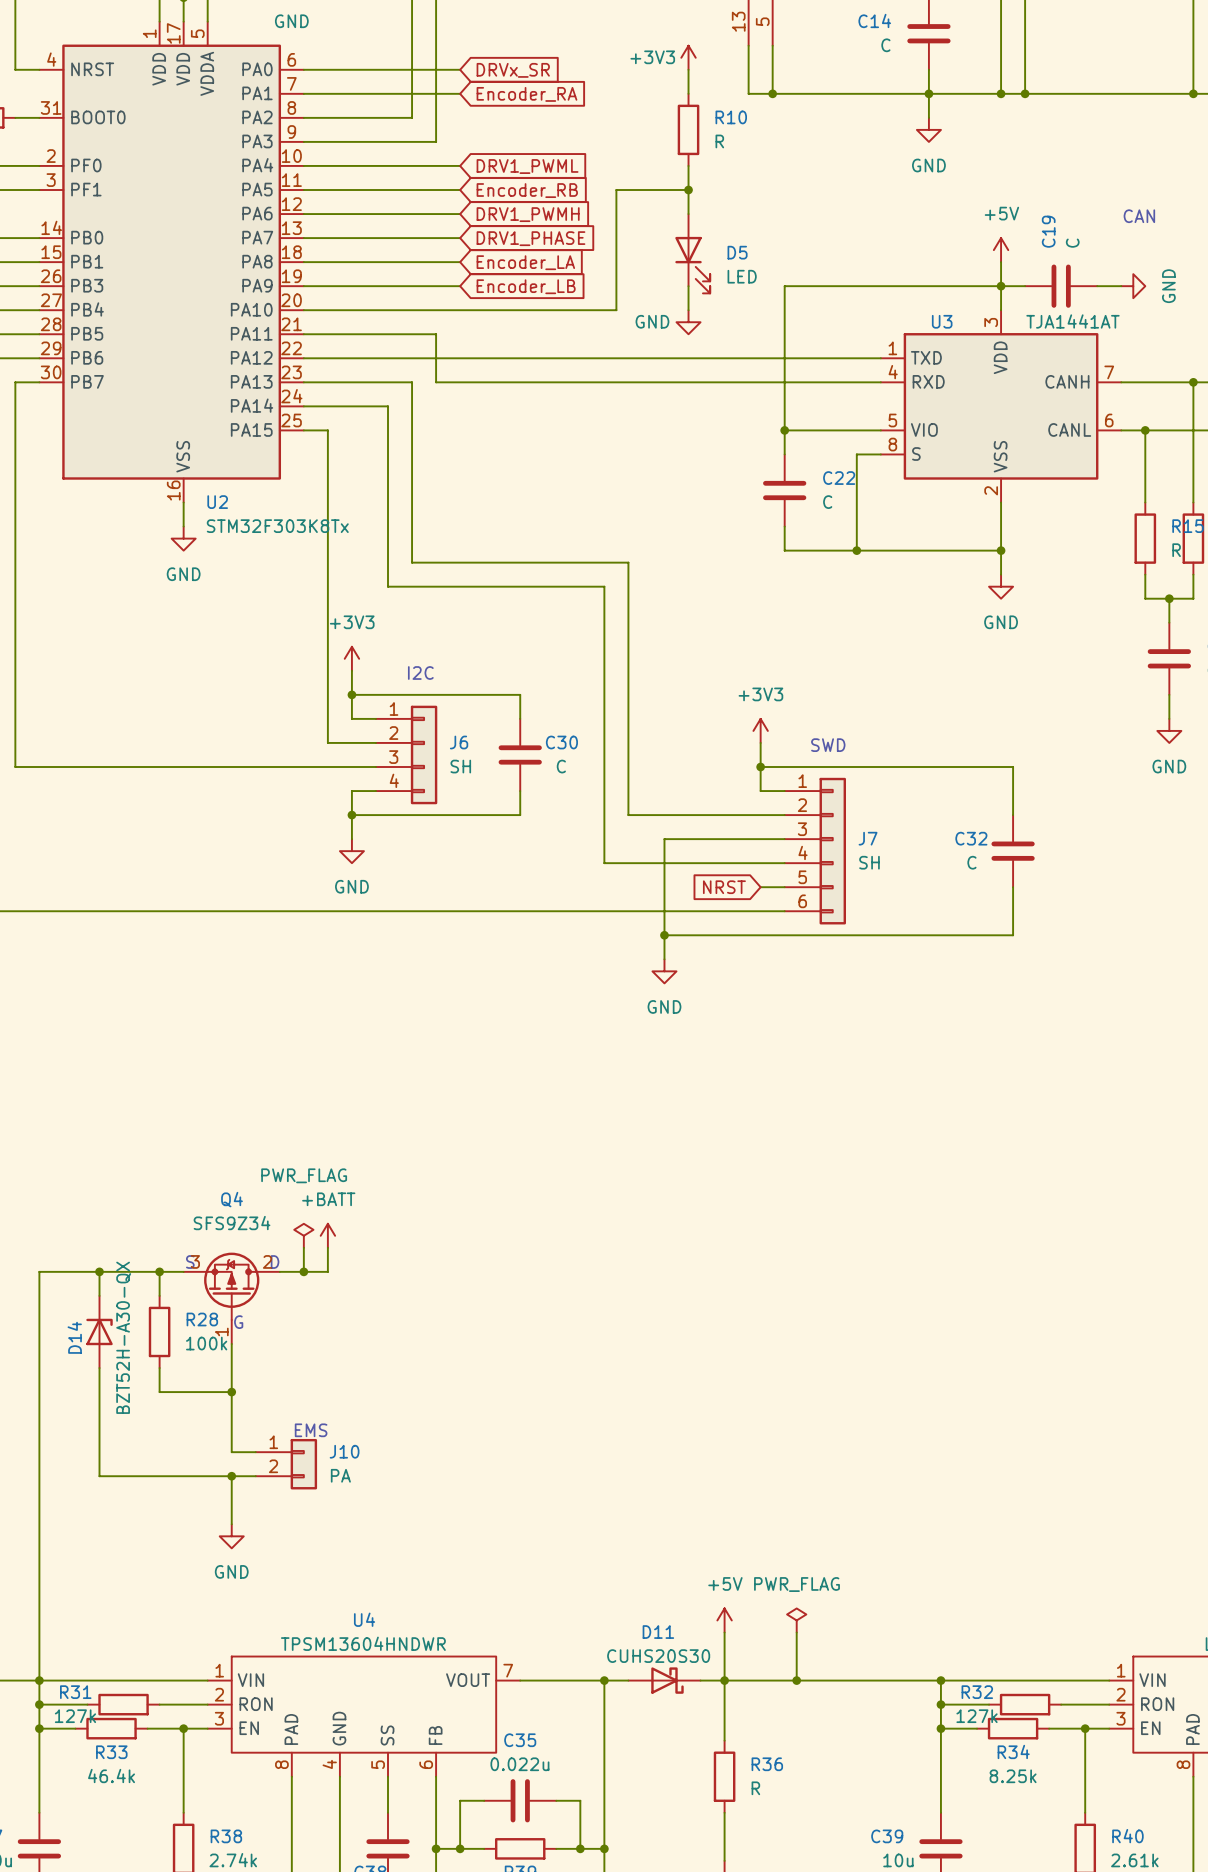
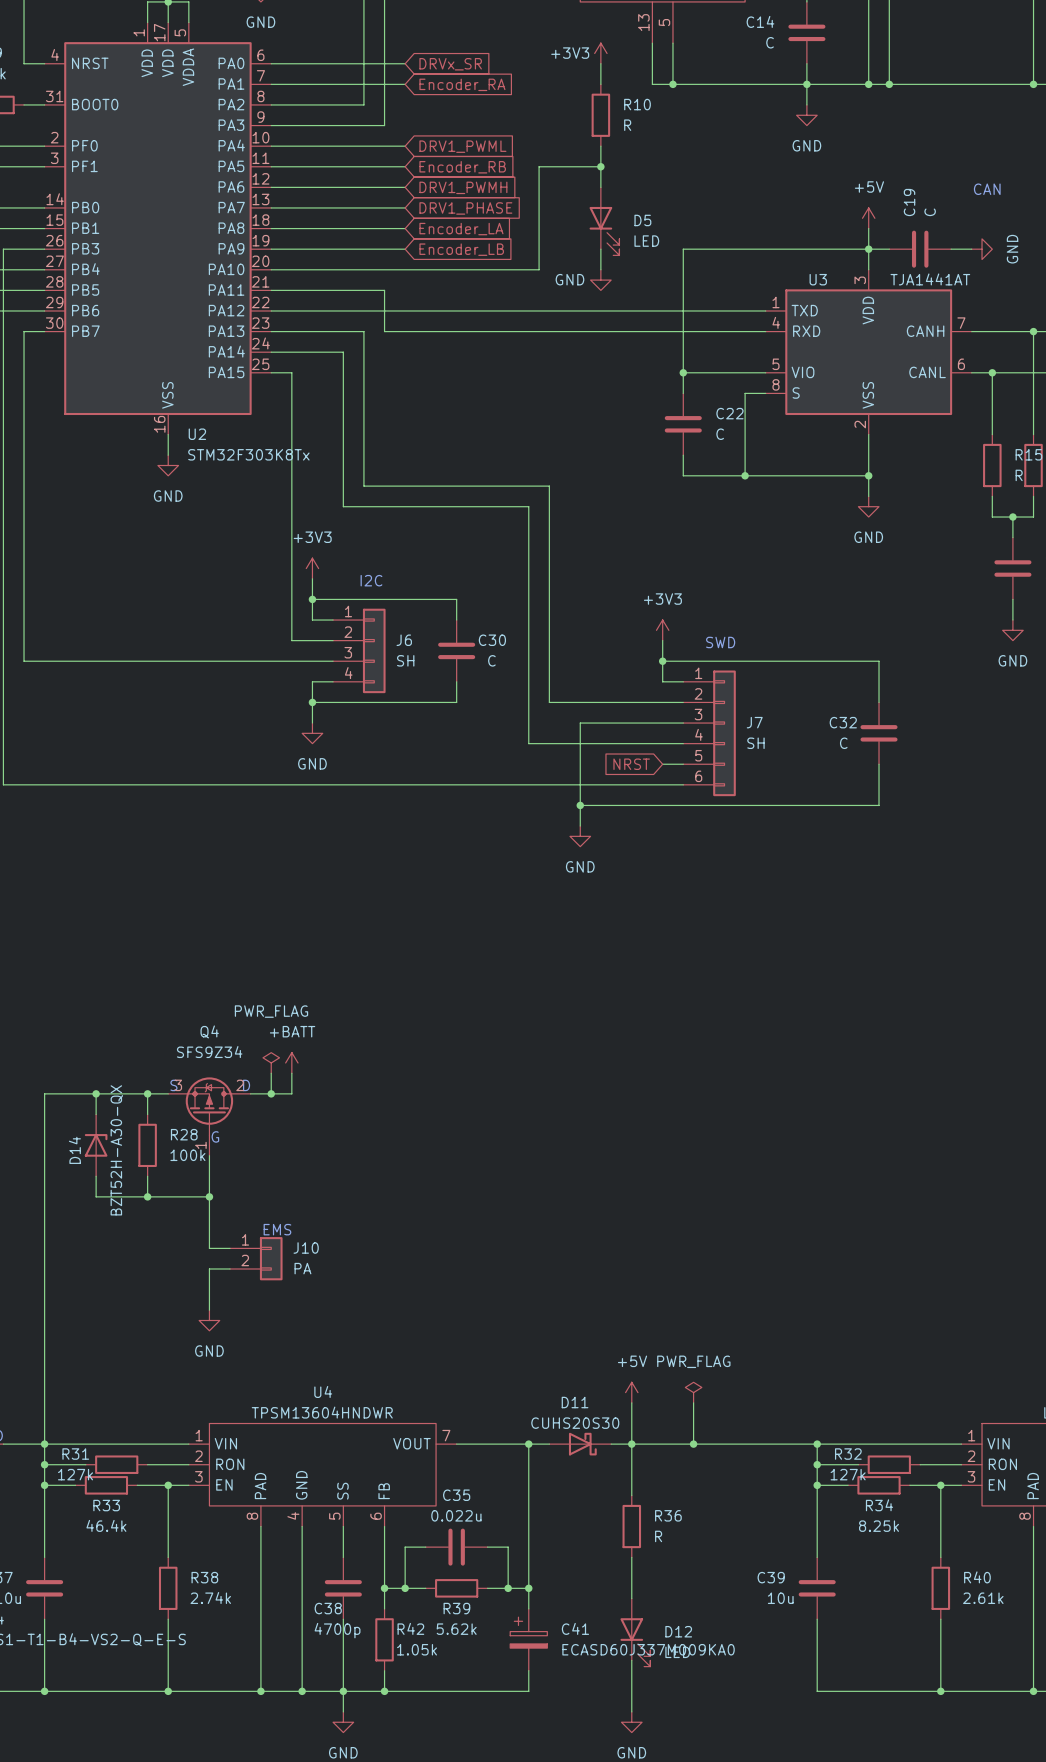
wire: (99, 1392) (99, 1476) (231, 1476) -> (96, 1196) (147, 1196)
junction: none -> (147, 1196)
junction: (231, 1476) -> none

